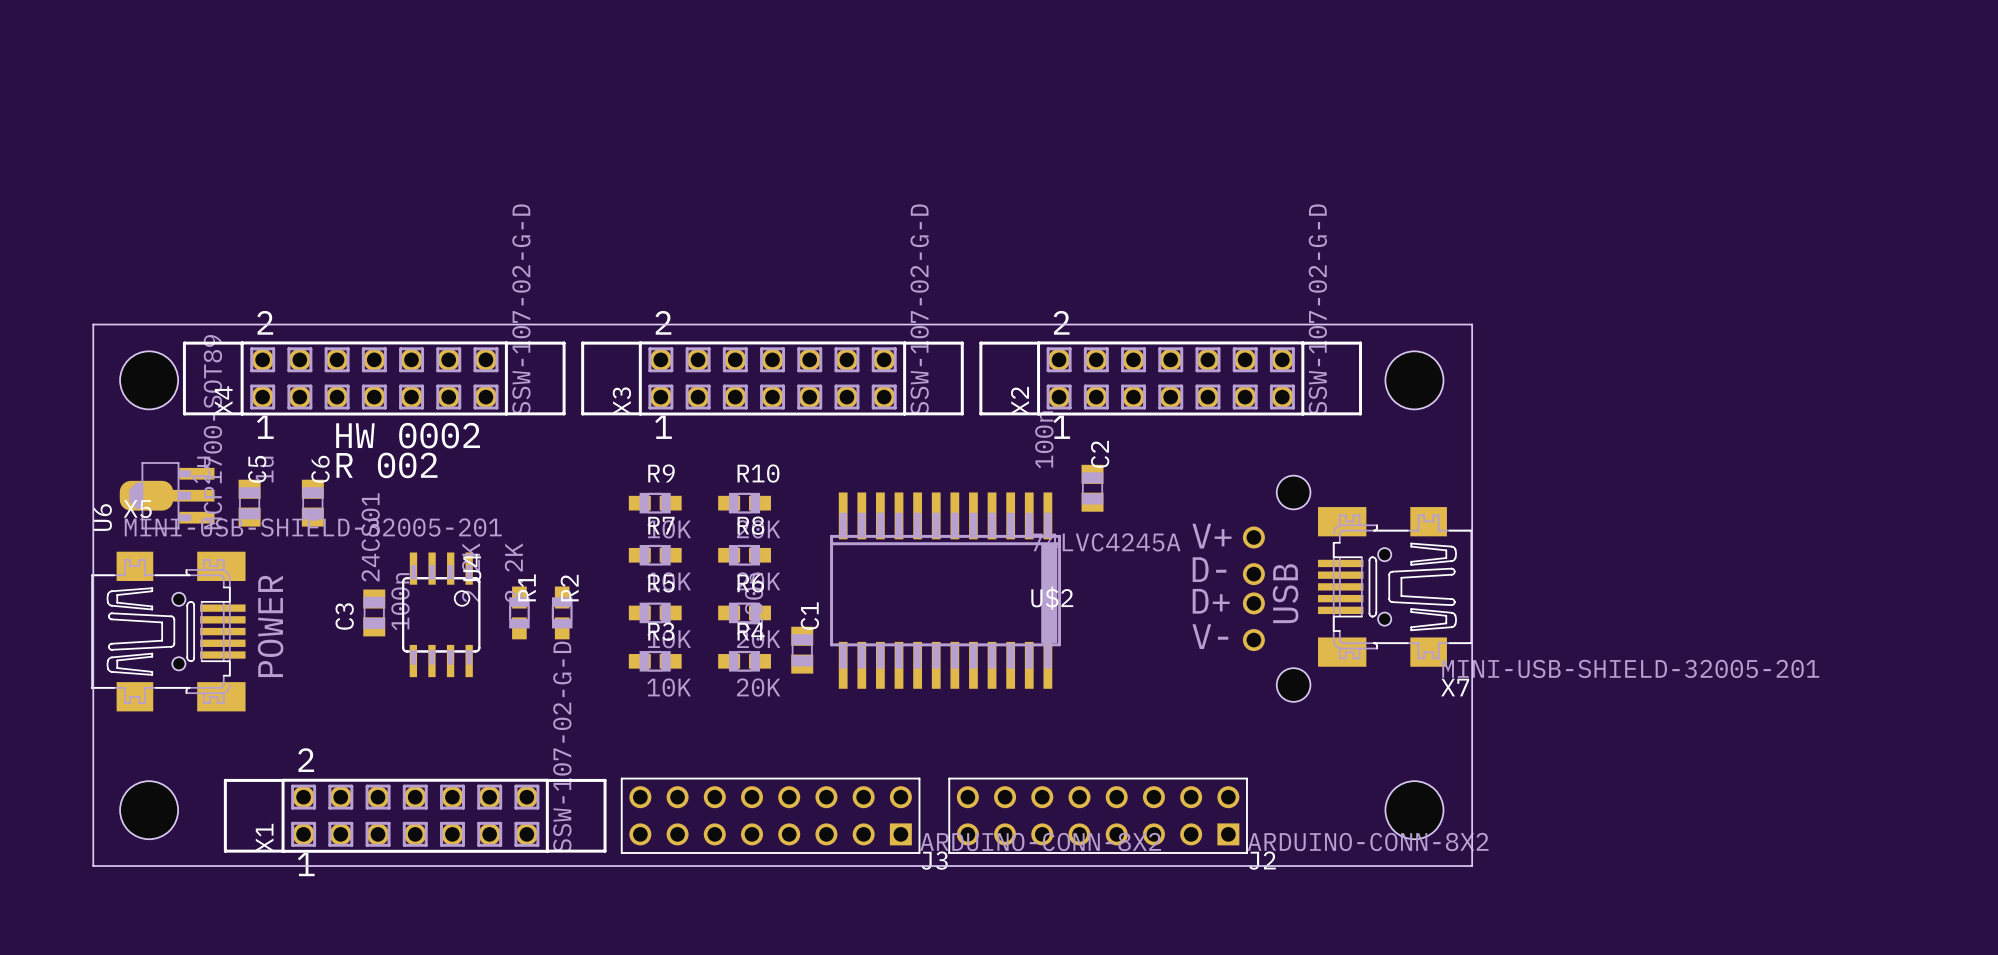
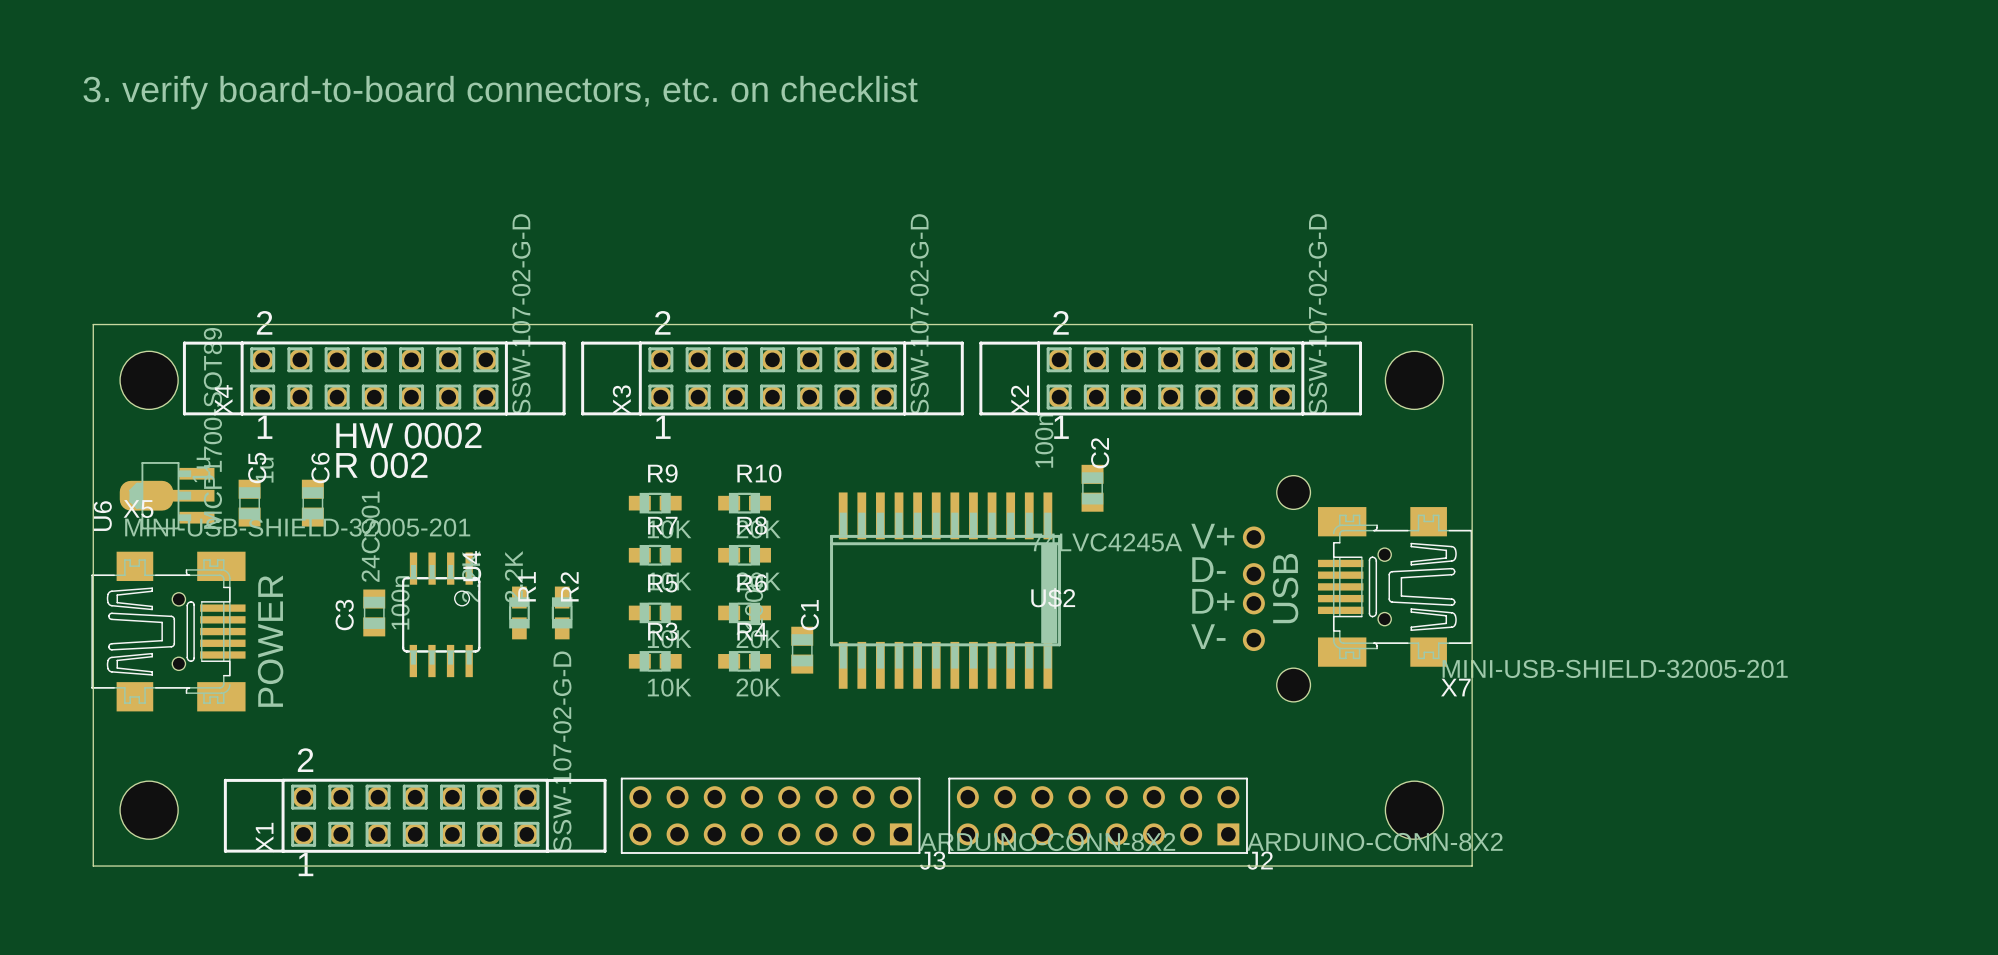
text: none -> 3. verify board-to-board connectors, etc. on checklist (500, 92)

